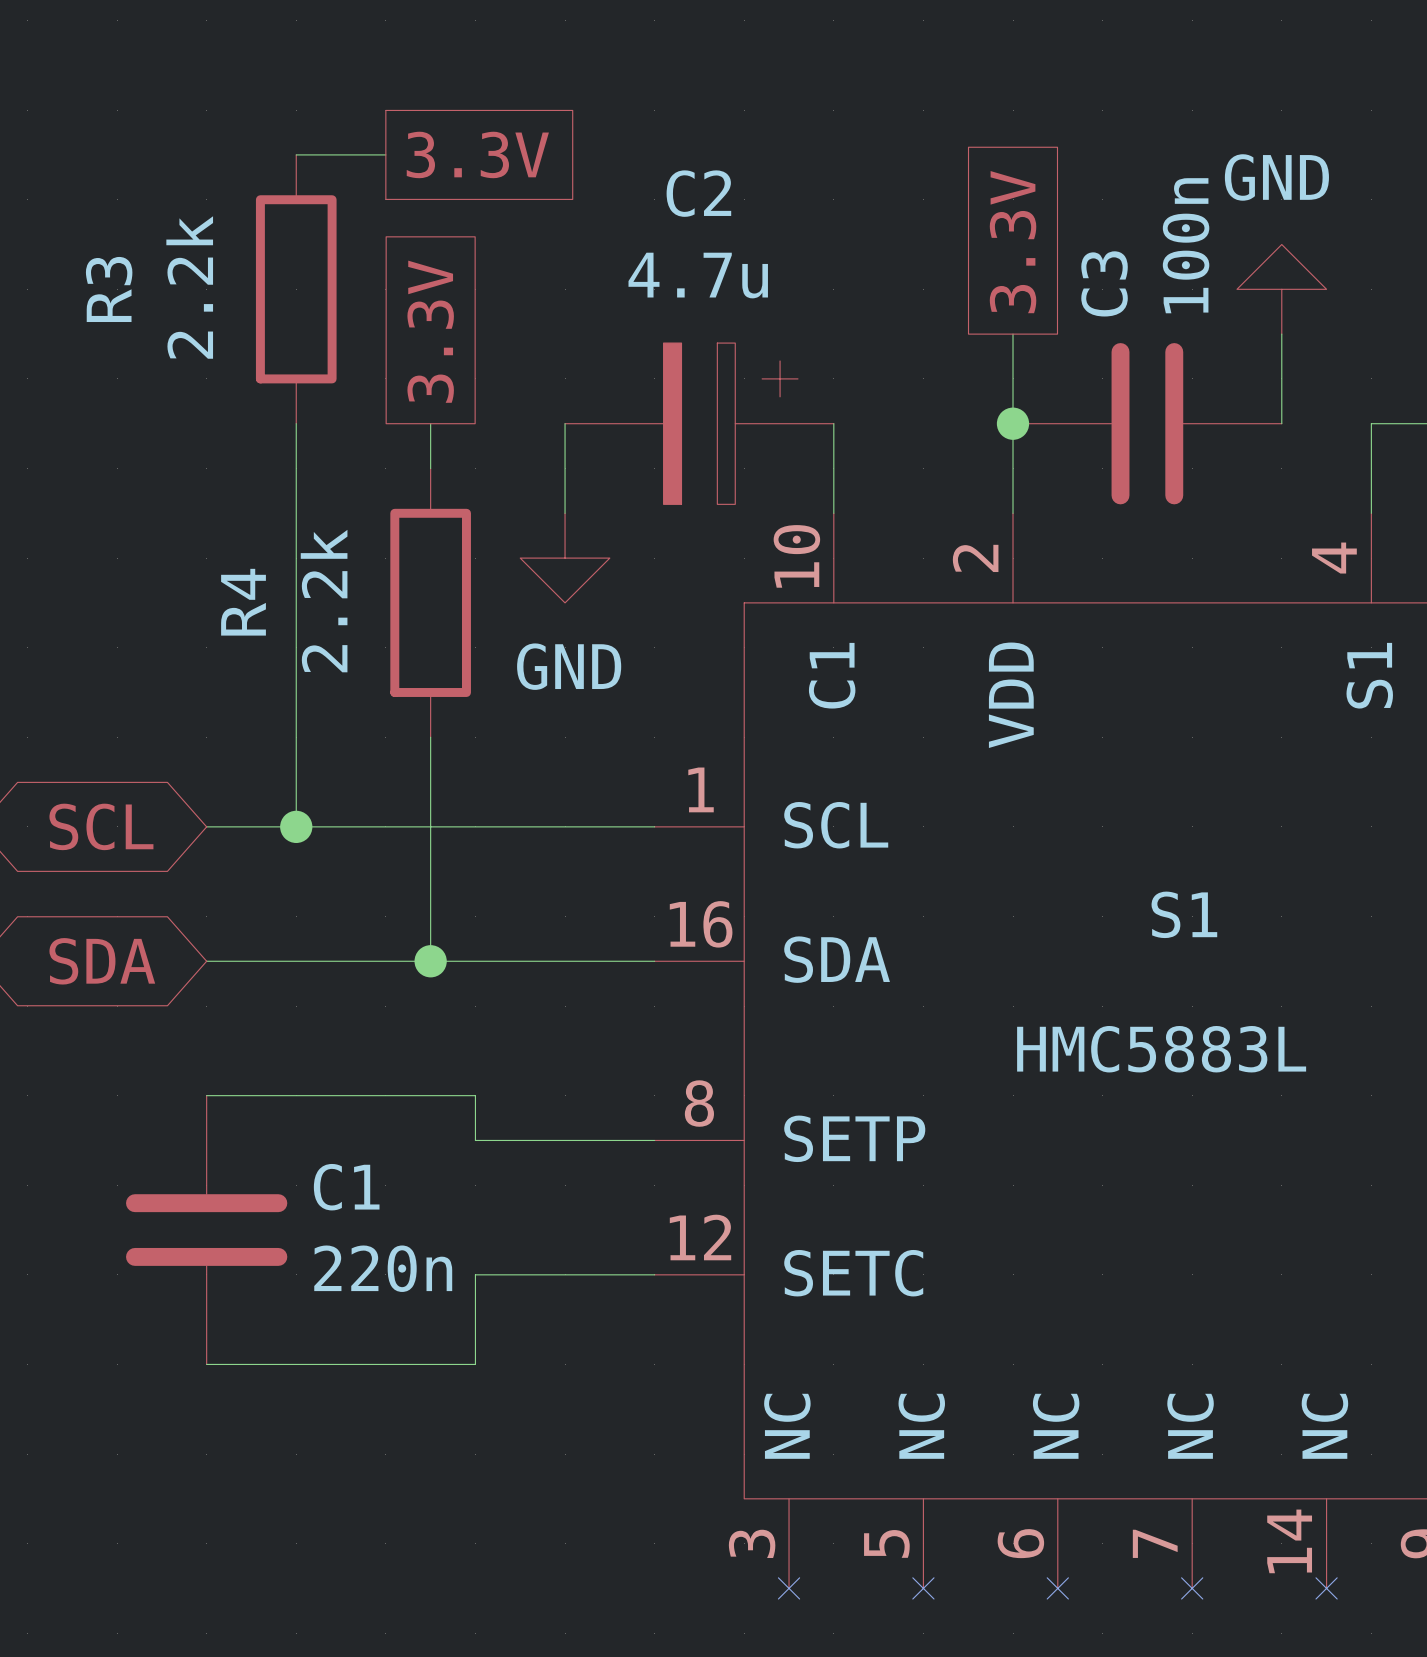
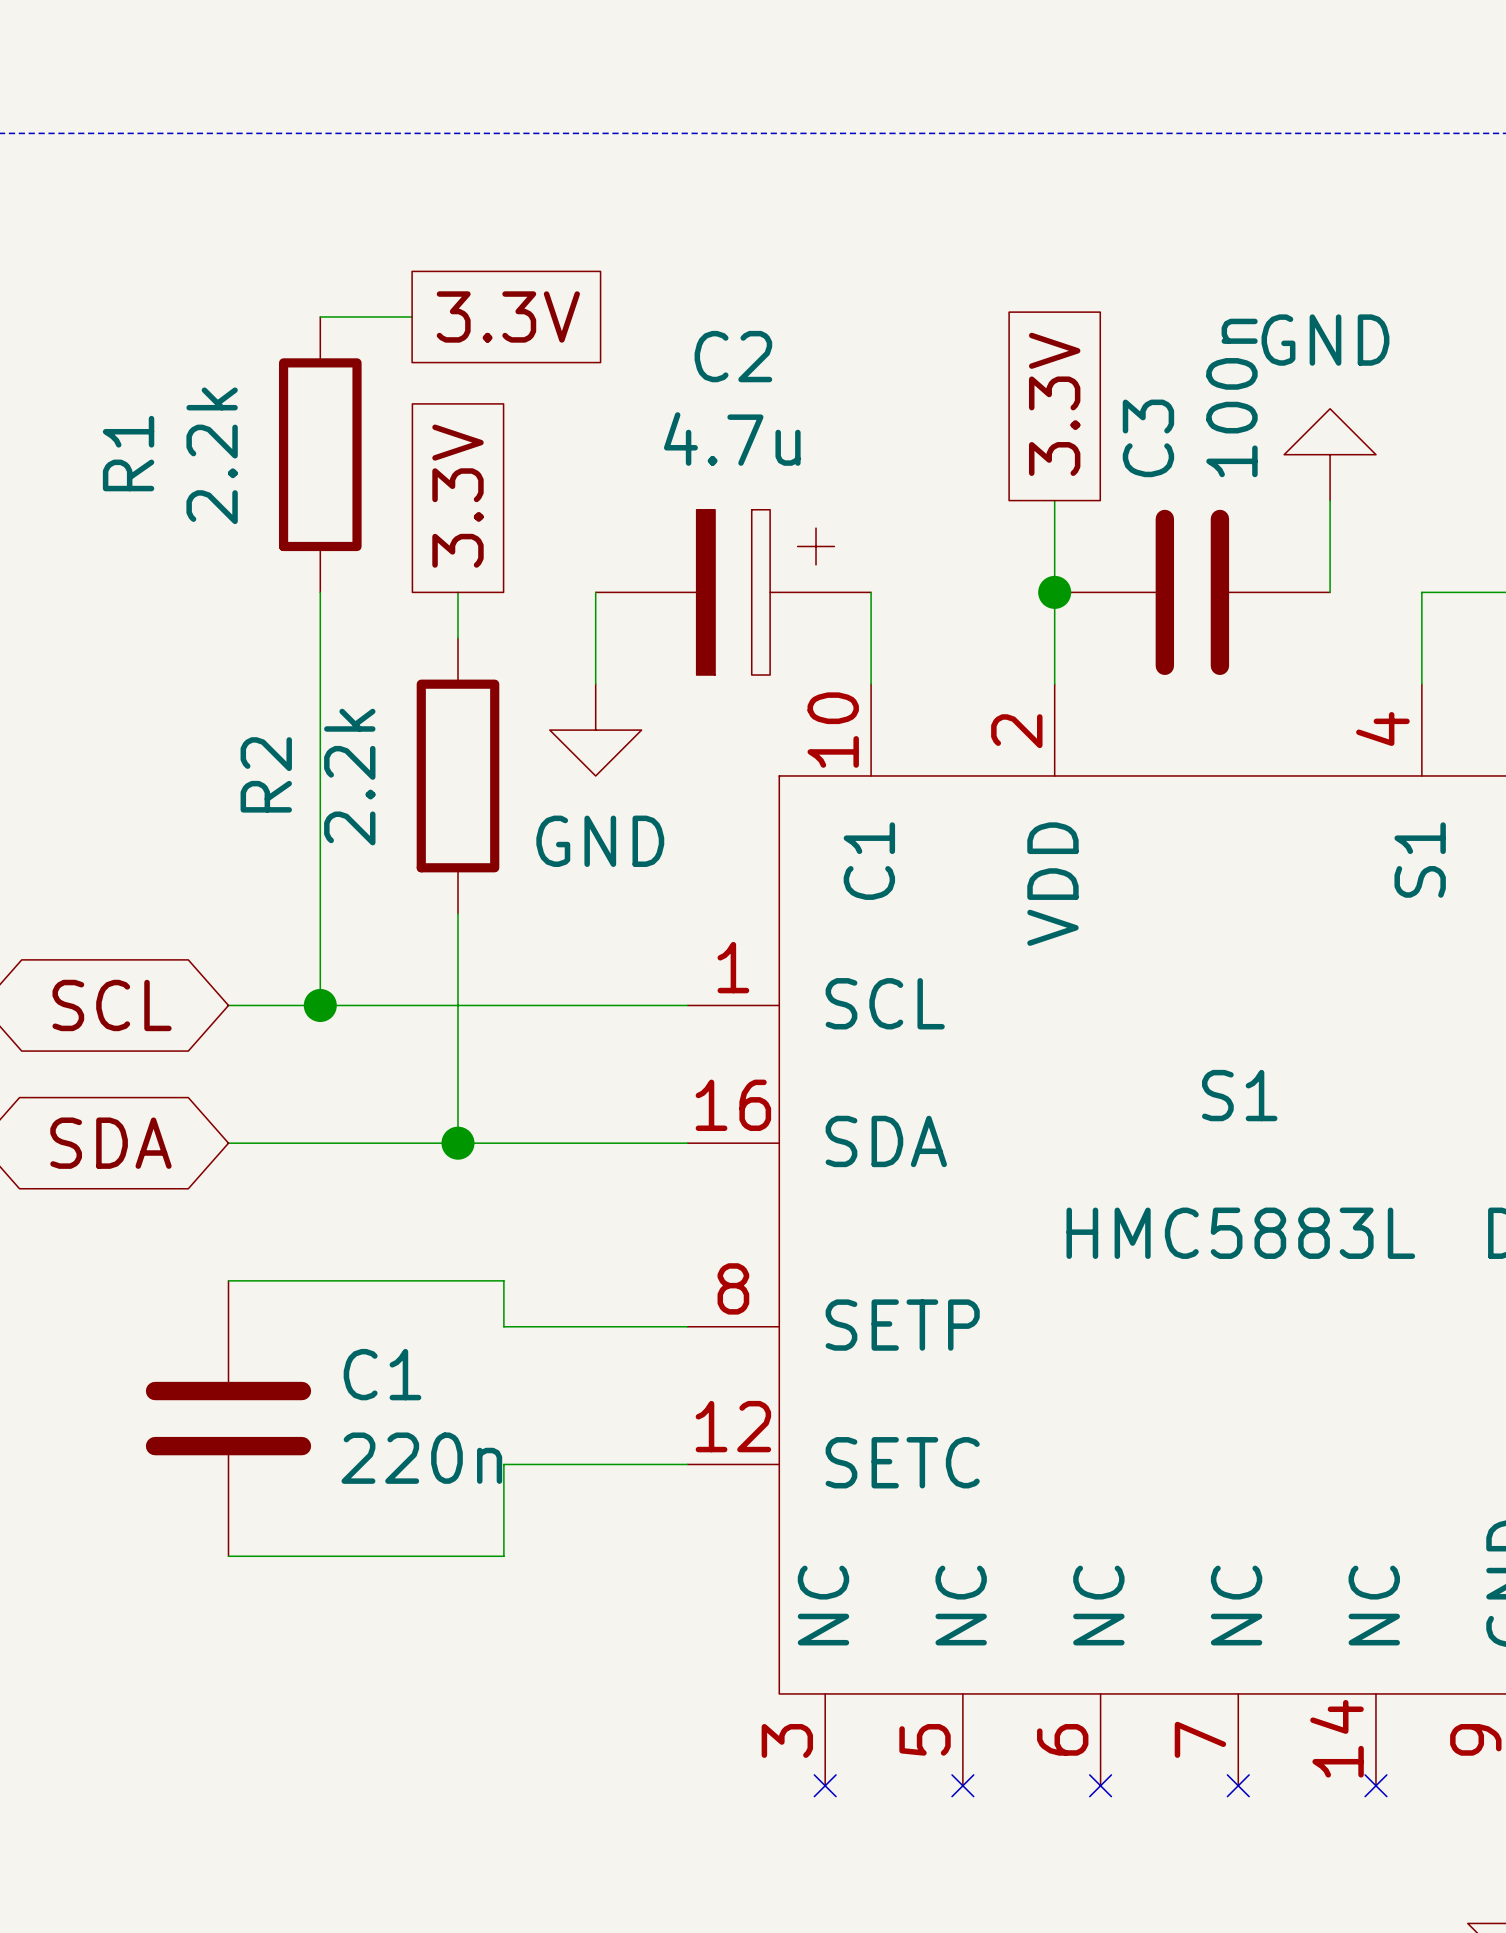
R3 name: R3 (109, 289) -> R1 (128, 453)
R4 name: R4 (243, 602) -> R2 (266, 774)

